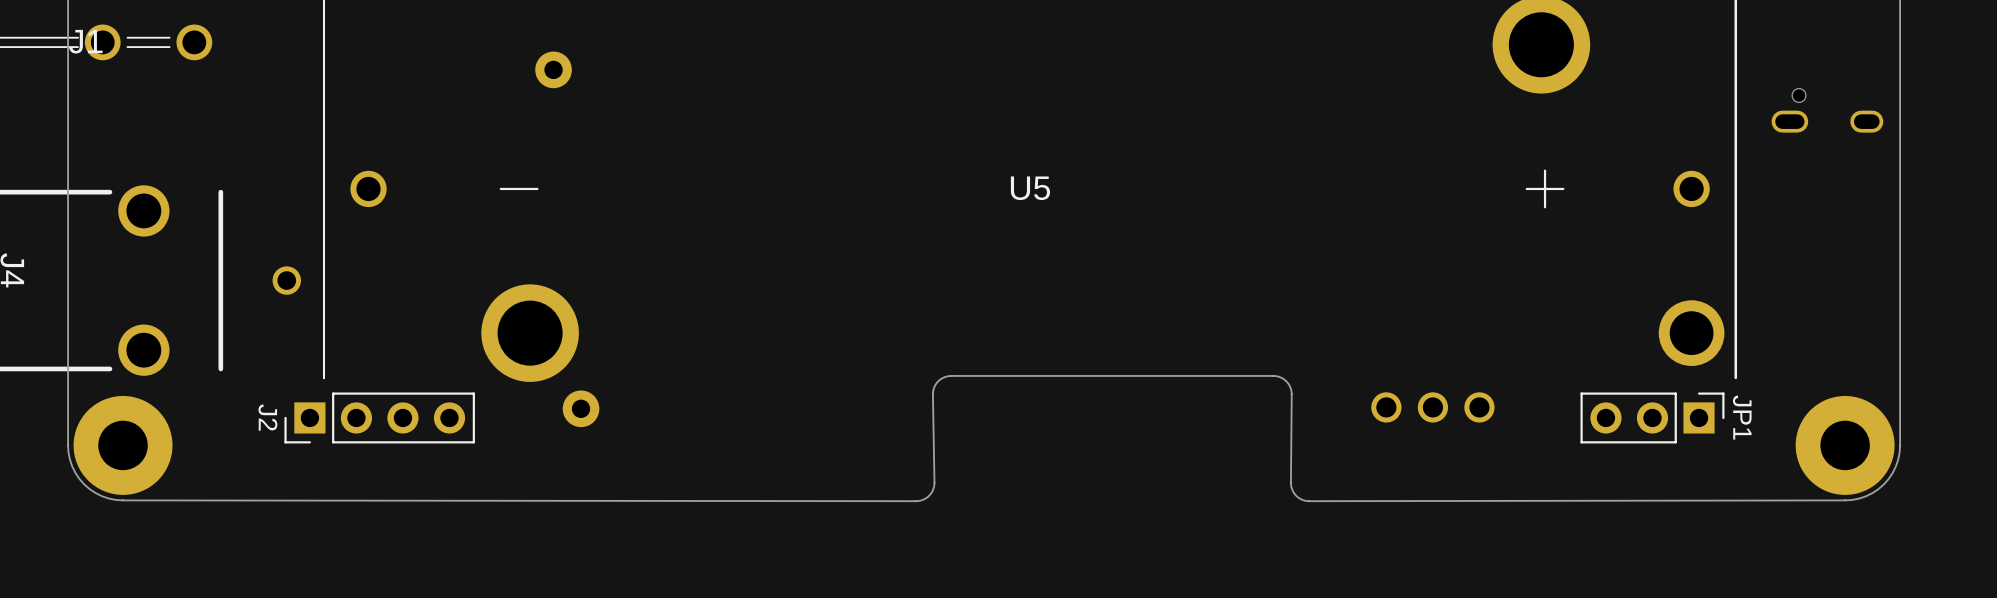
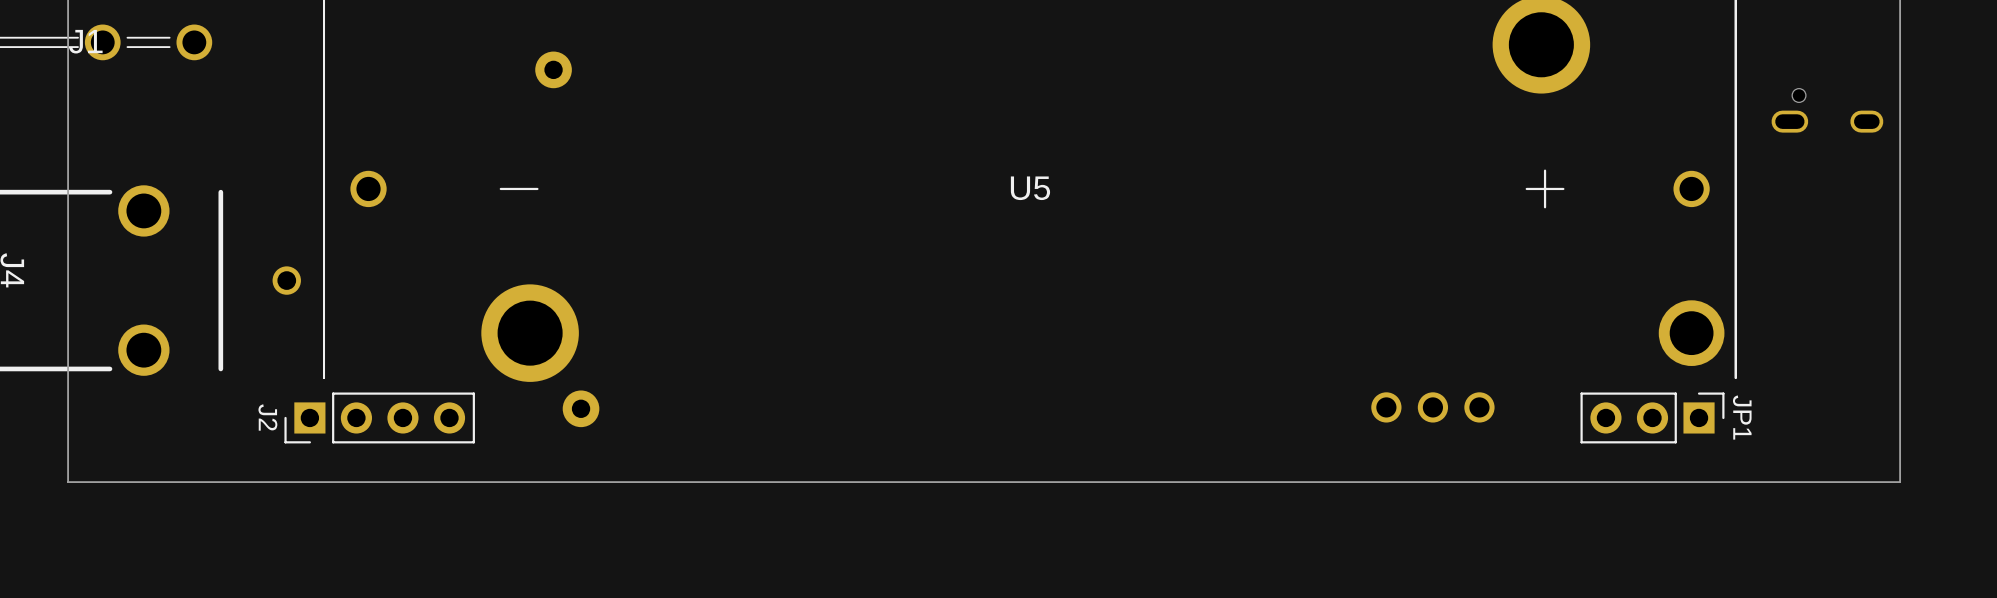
part: (123, 445) -> none
part: (1845, 445) -> none
board edge: (1900, 445) (1898, 459) (1888, 478) (1872, 493) (1852, 499) (1307, 501) (1296, 495) (1291, 484) (1291, 390) (1284, 379) (1273, 375) (945, 376) (936, 382) (933, 392) (934, 486) (927, 497) (918, 501) (123, 500) (101, 496) (84, 484) (72, 466) (68, 445) -> (1900, 445) (1900, 482) (68, 482) (68, 445)

